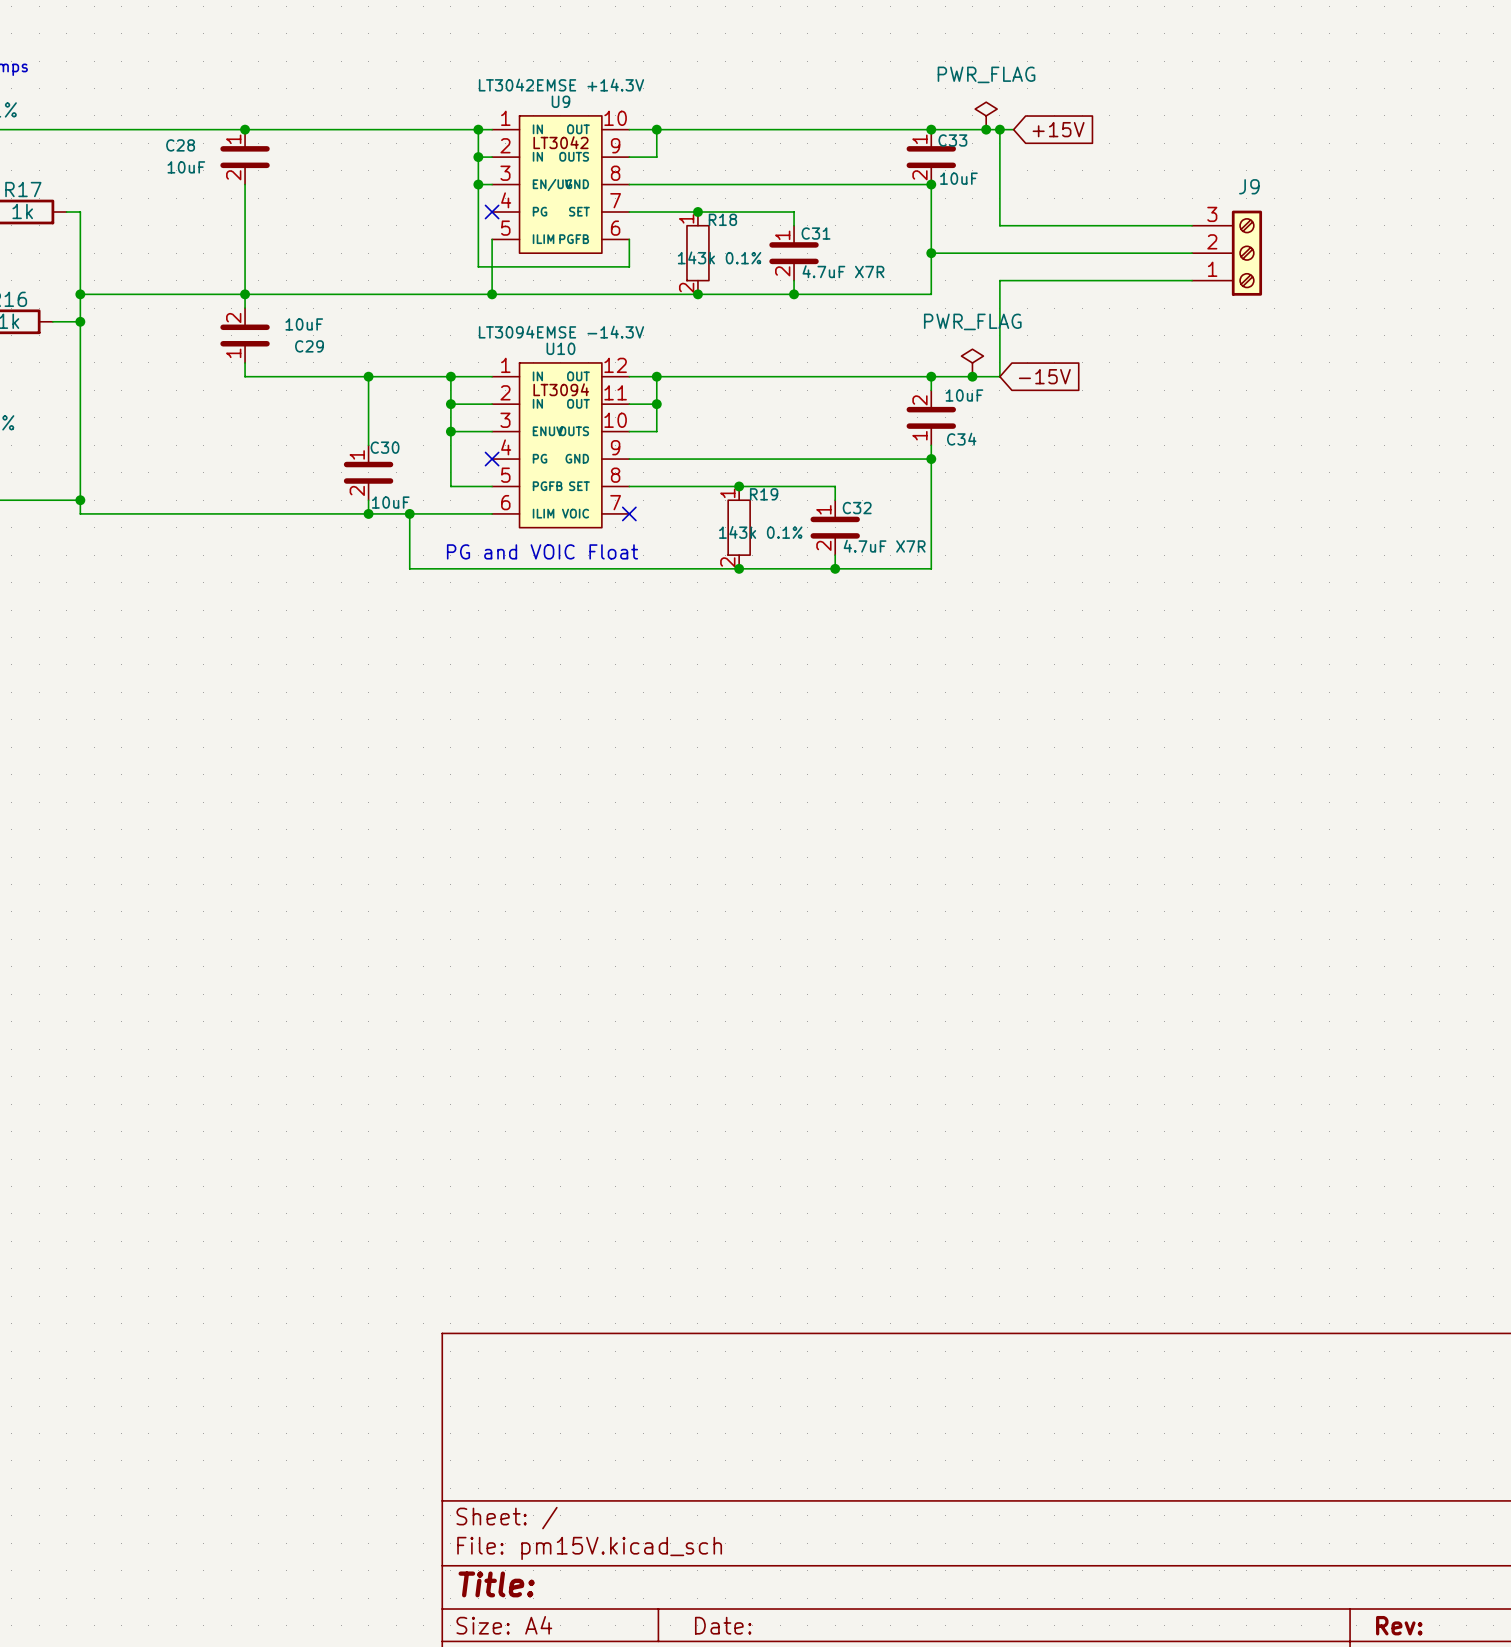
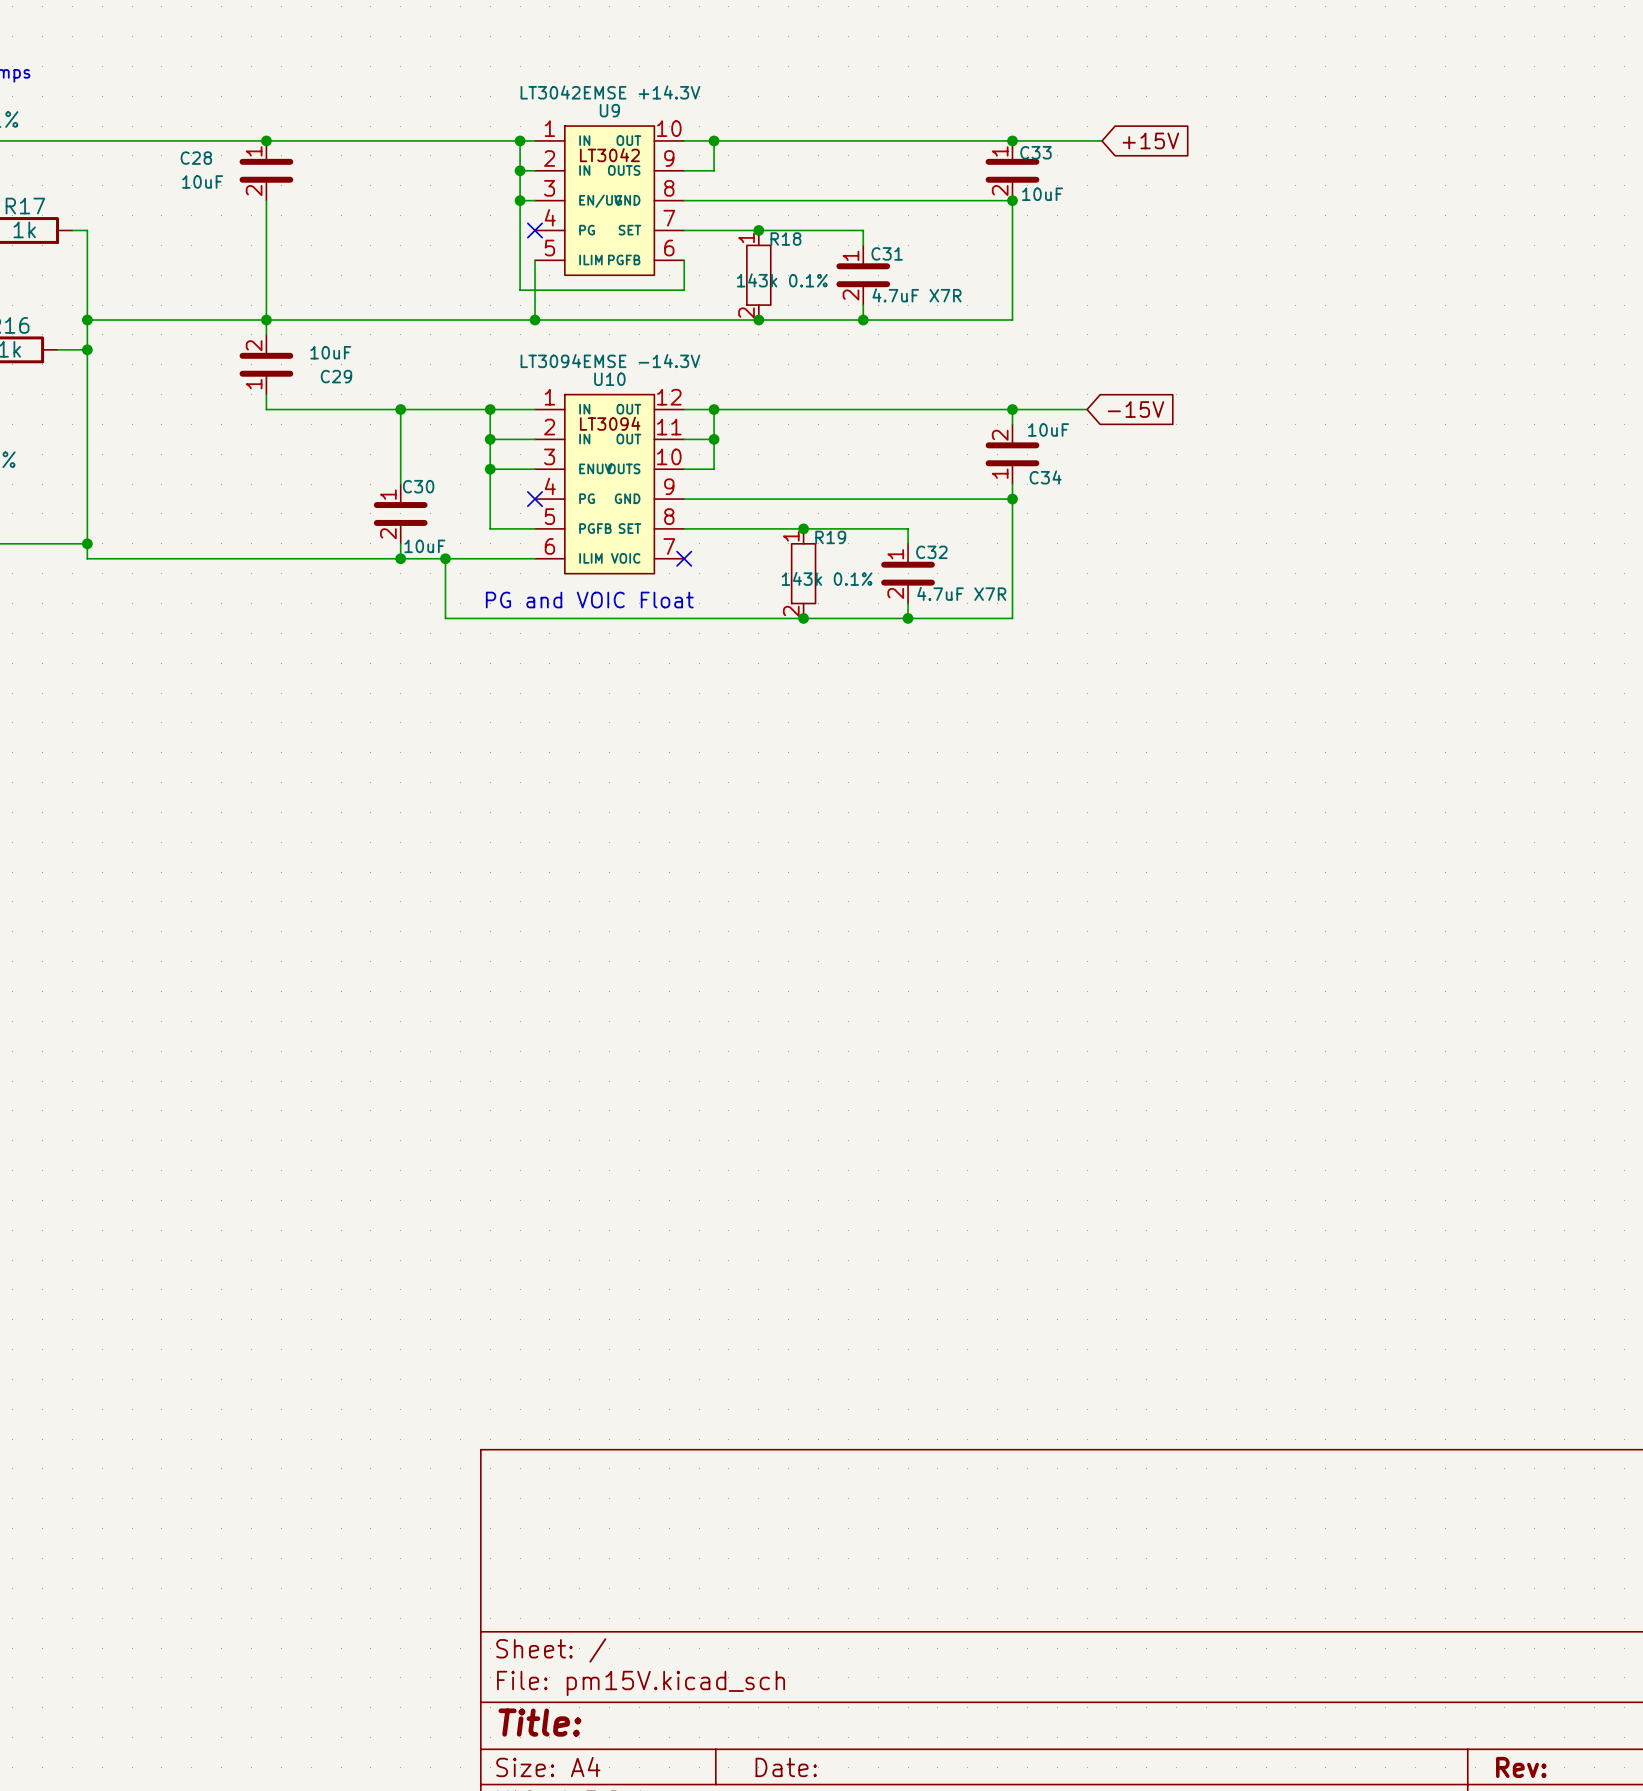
power symbol: PWR_FLAG (986, 115) -> none
junction: (986, 129) -> none
wire: (999, 129) (999, 225) (1192, 225) -> none
junction: (999, 129) -> none
wire: (931, 253) (1192, 253) -> none
junction: (931, 253) -> none
J9: (1227, 253) -> none
wire: (1192, 280) (999, 280) (999, 376) -> none
power symbol: PWR_FLAG (972, 362) -> none
junction: (972, 376) -> none

